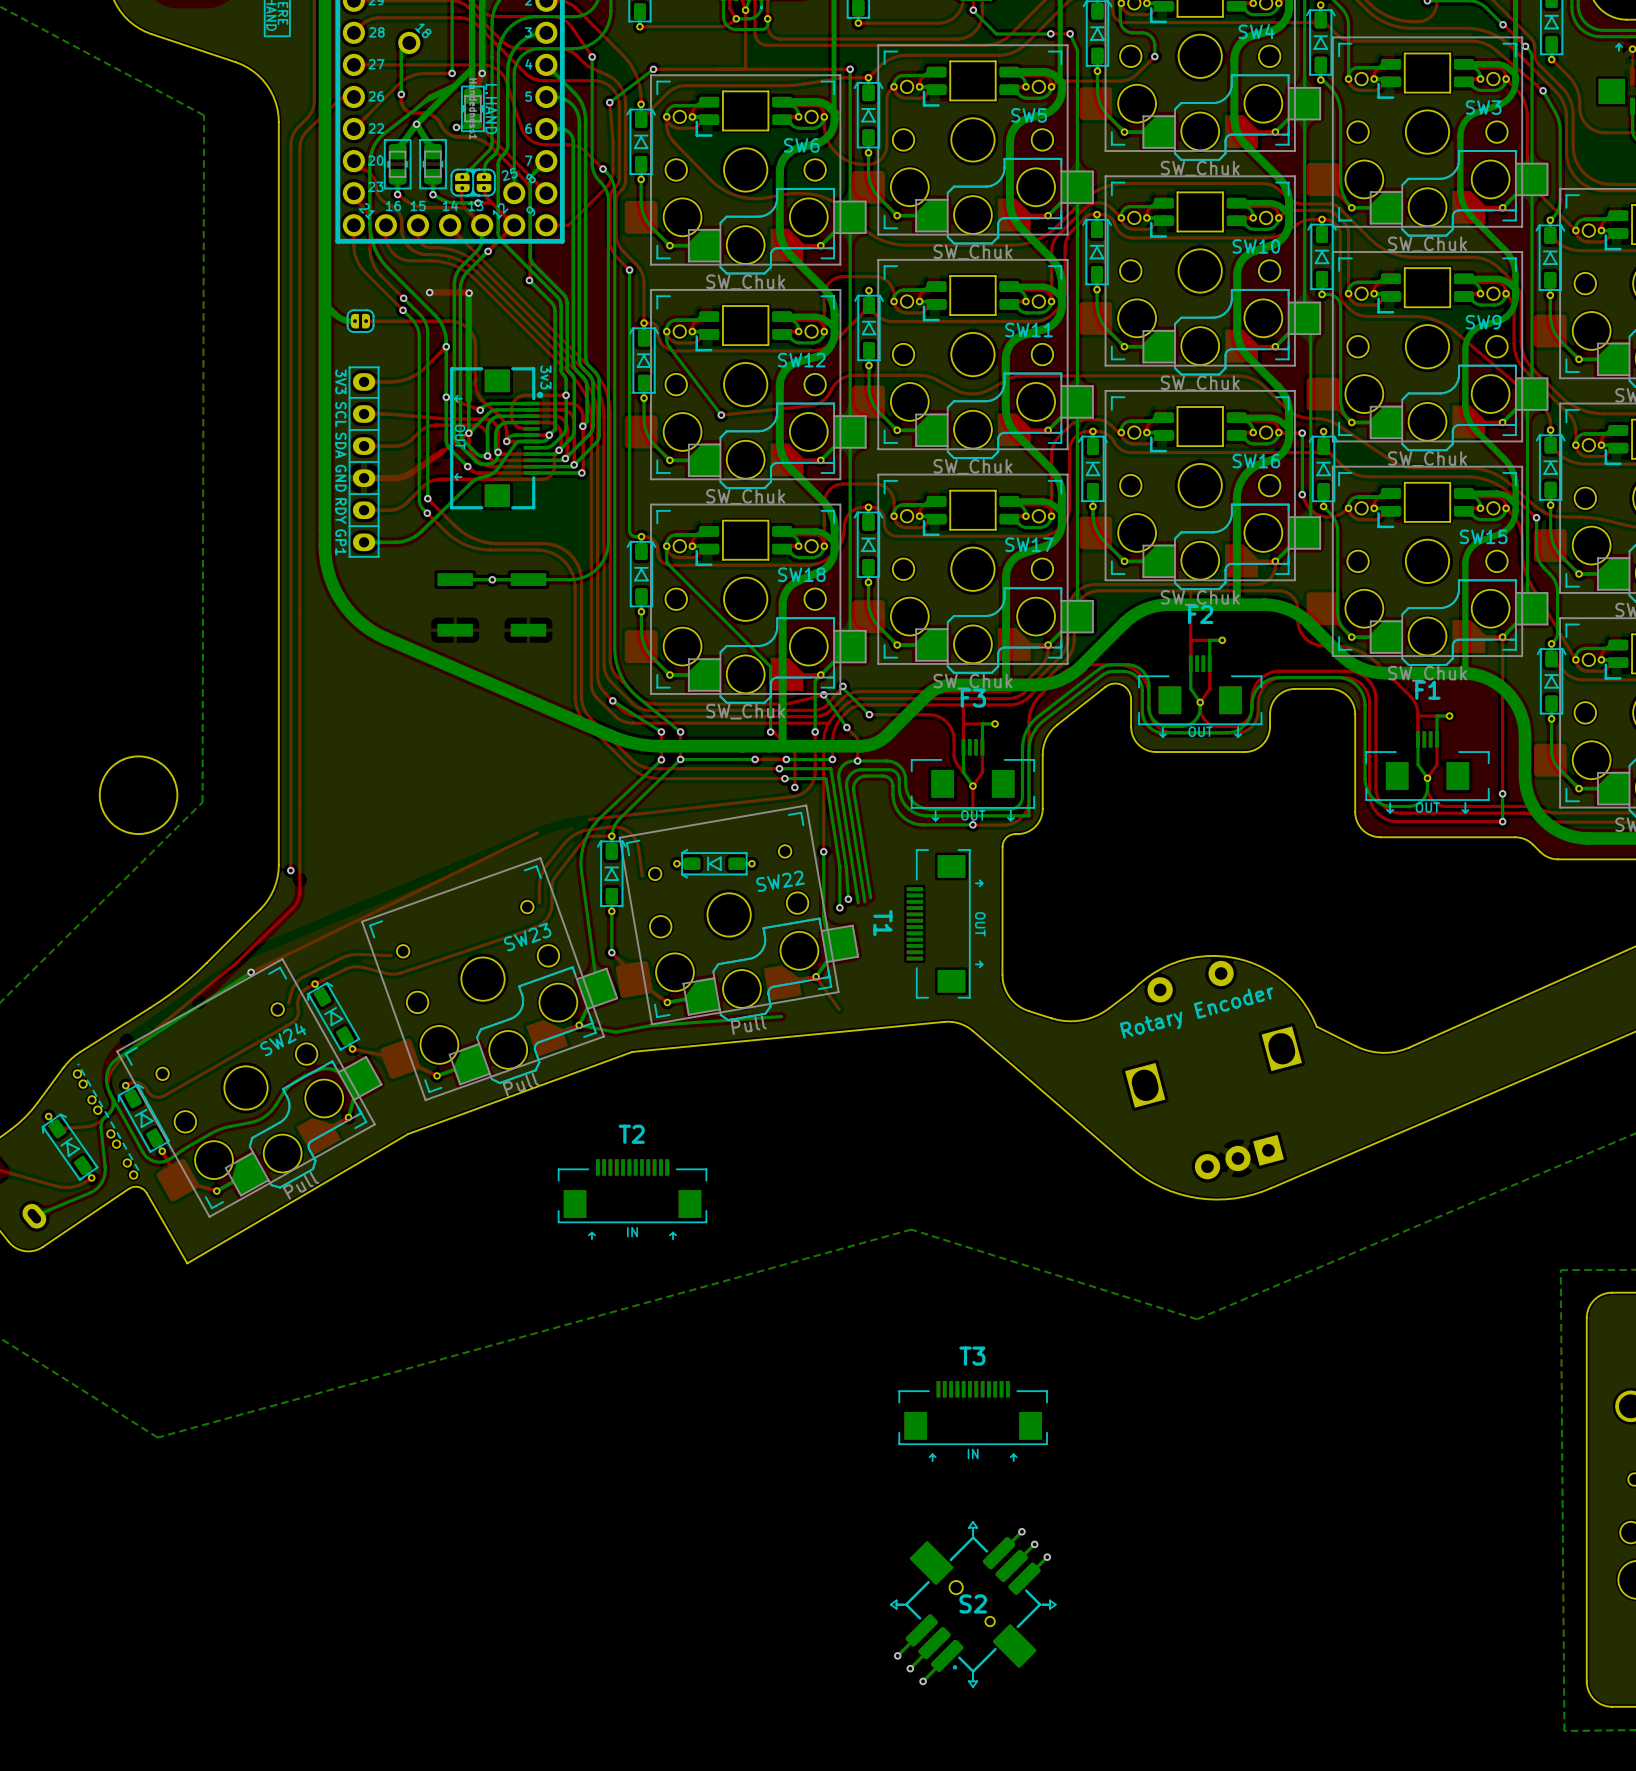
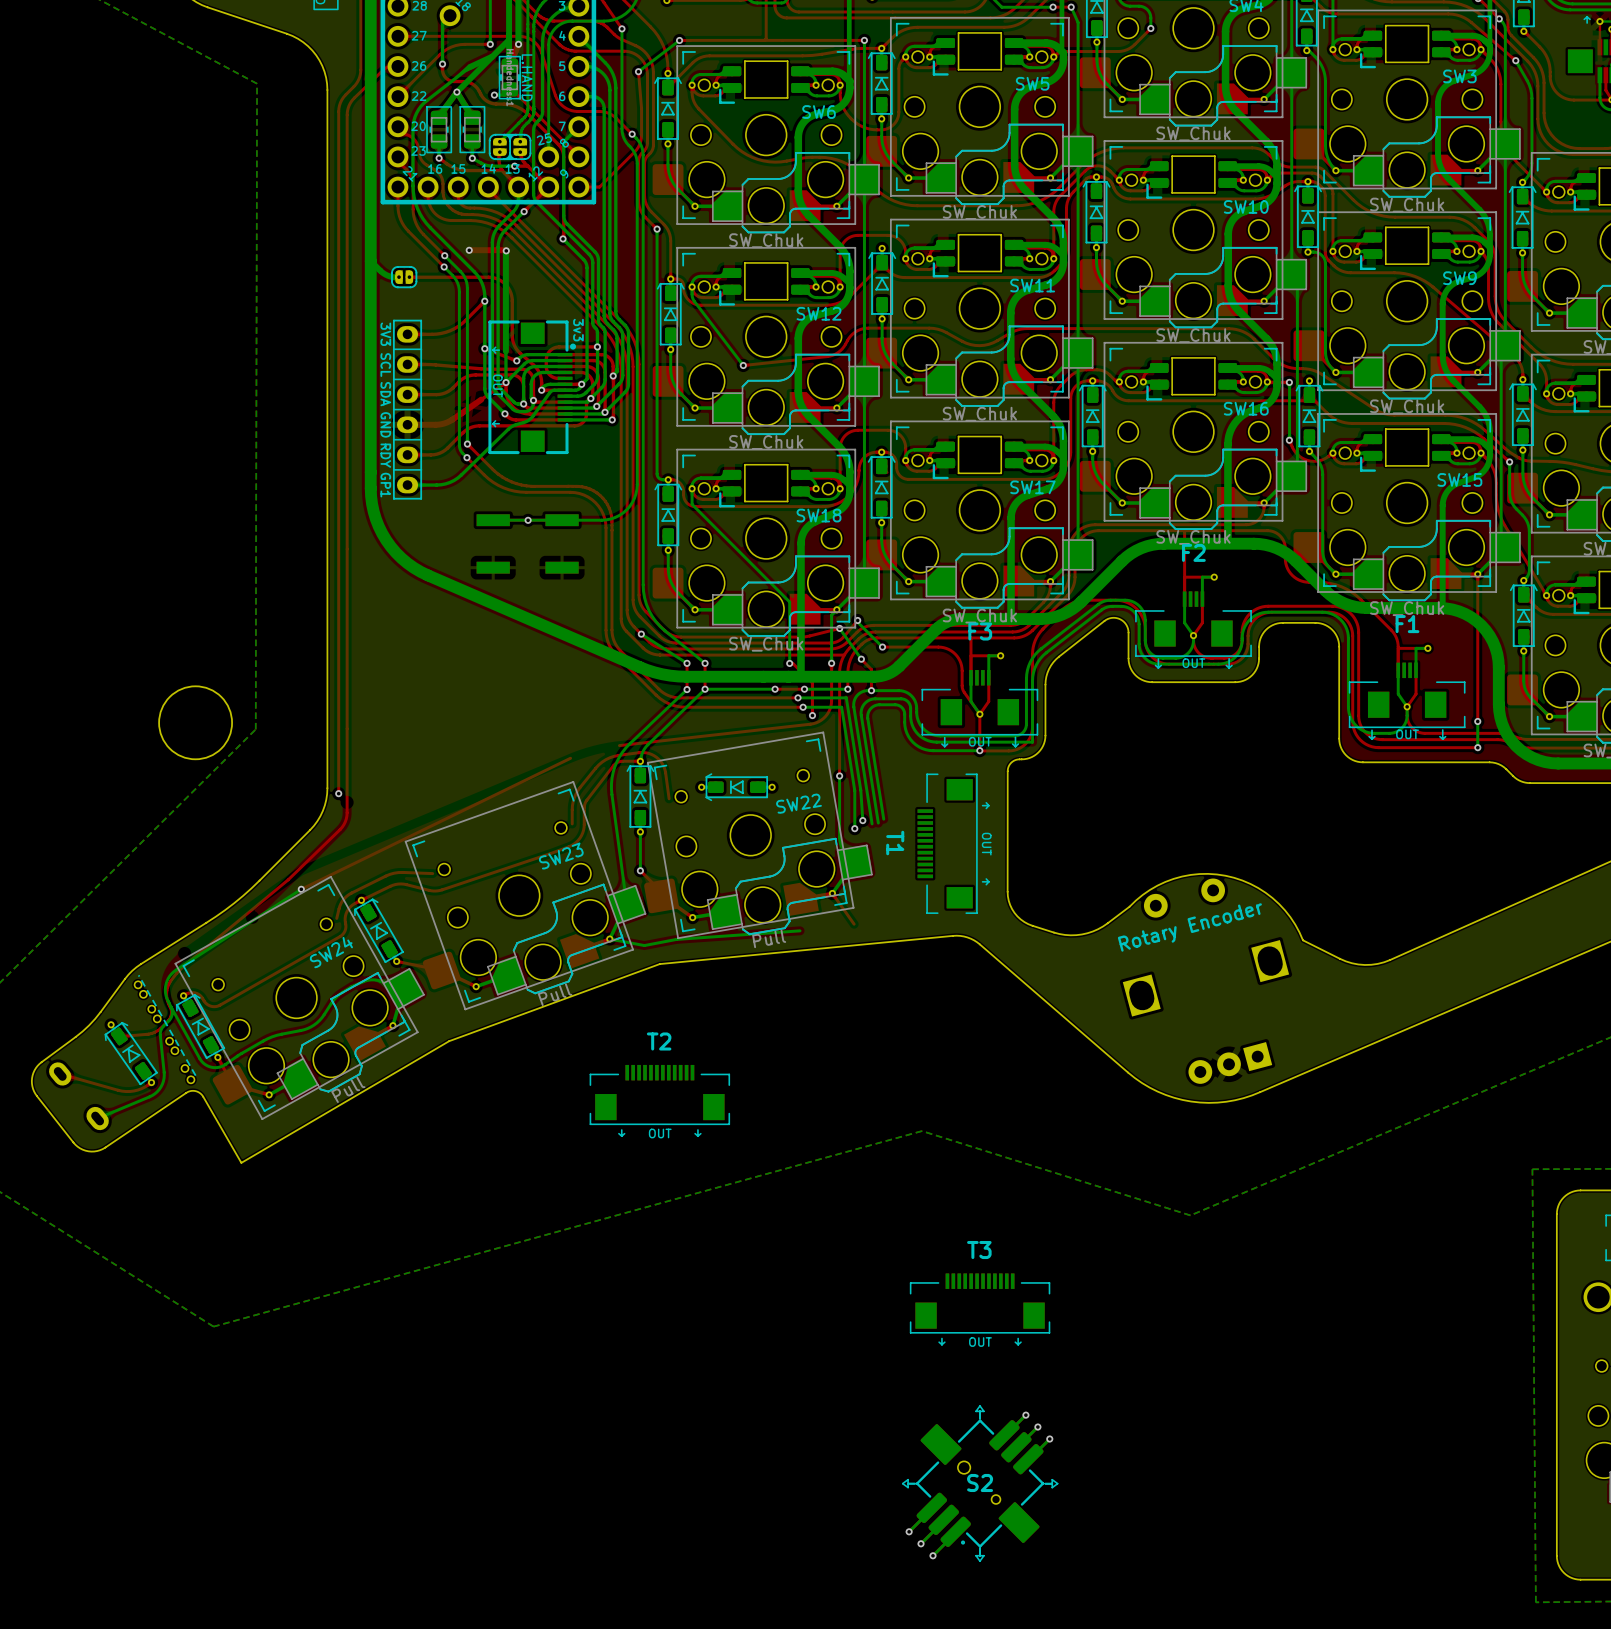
T2 footprint: [558, 1159, 707, 1240] -> [589, 1064, 730, 1137]
T3 footprint: [898, 1381, 1048, 1462] -> [910, 1273, 1051, 1346]

